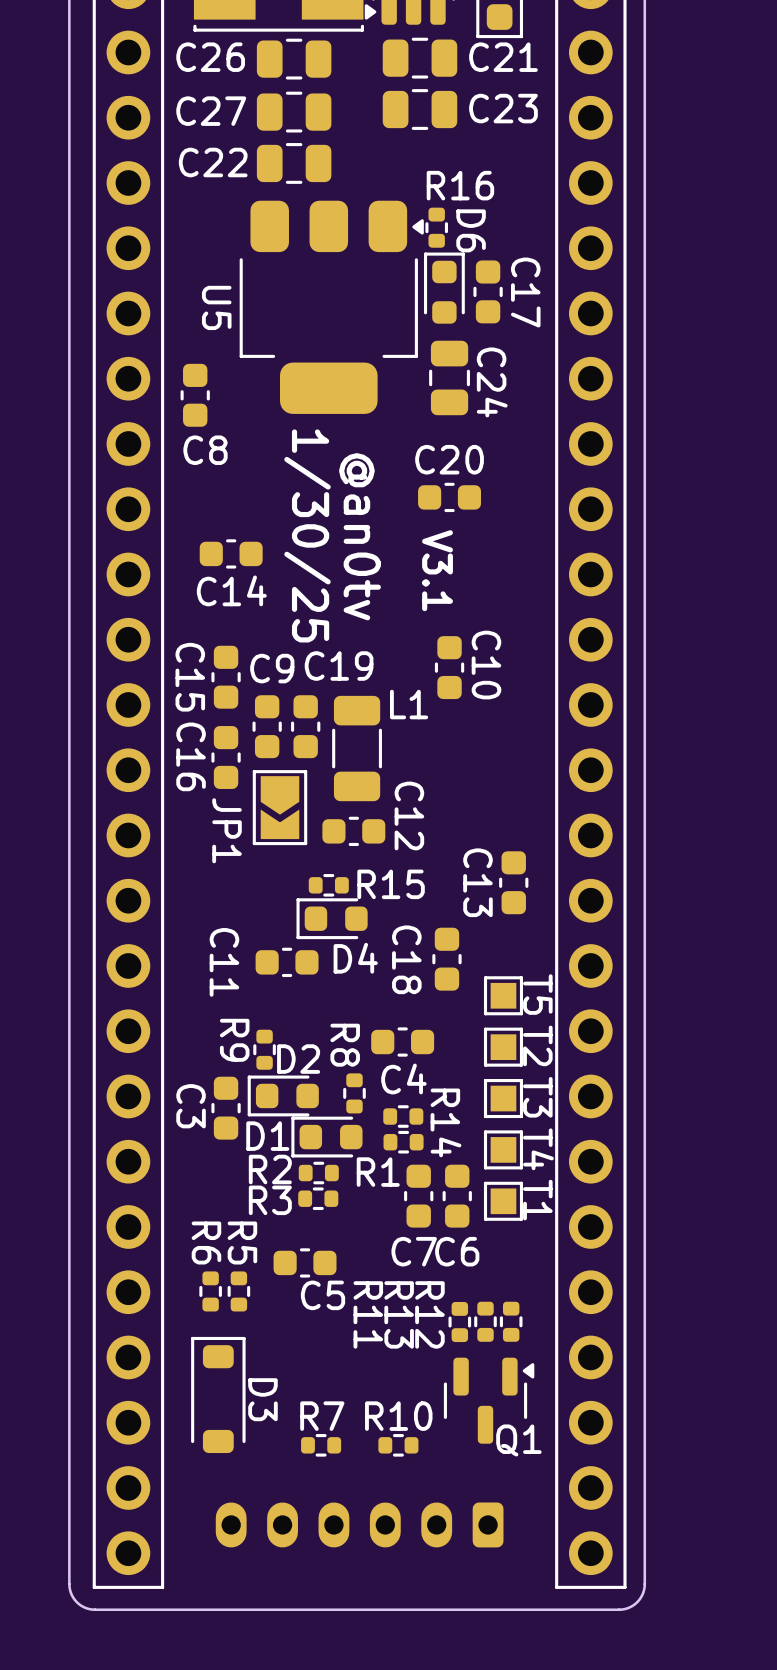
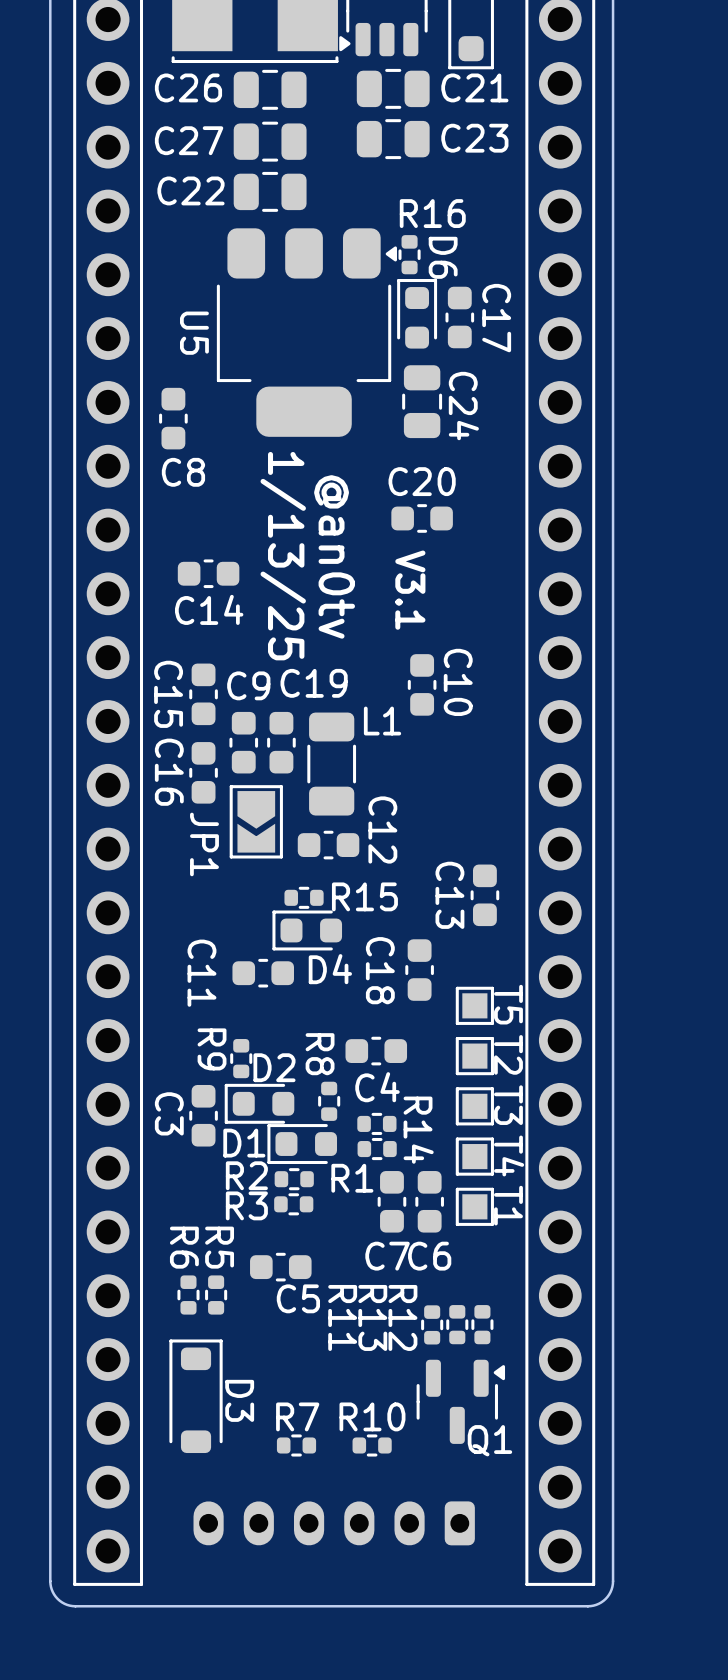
text: 1/30/25 (307, 535) -> 1/13/25 (283, 556)

